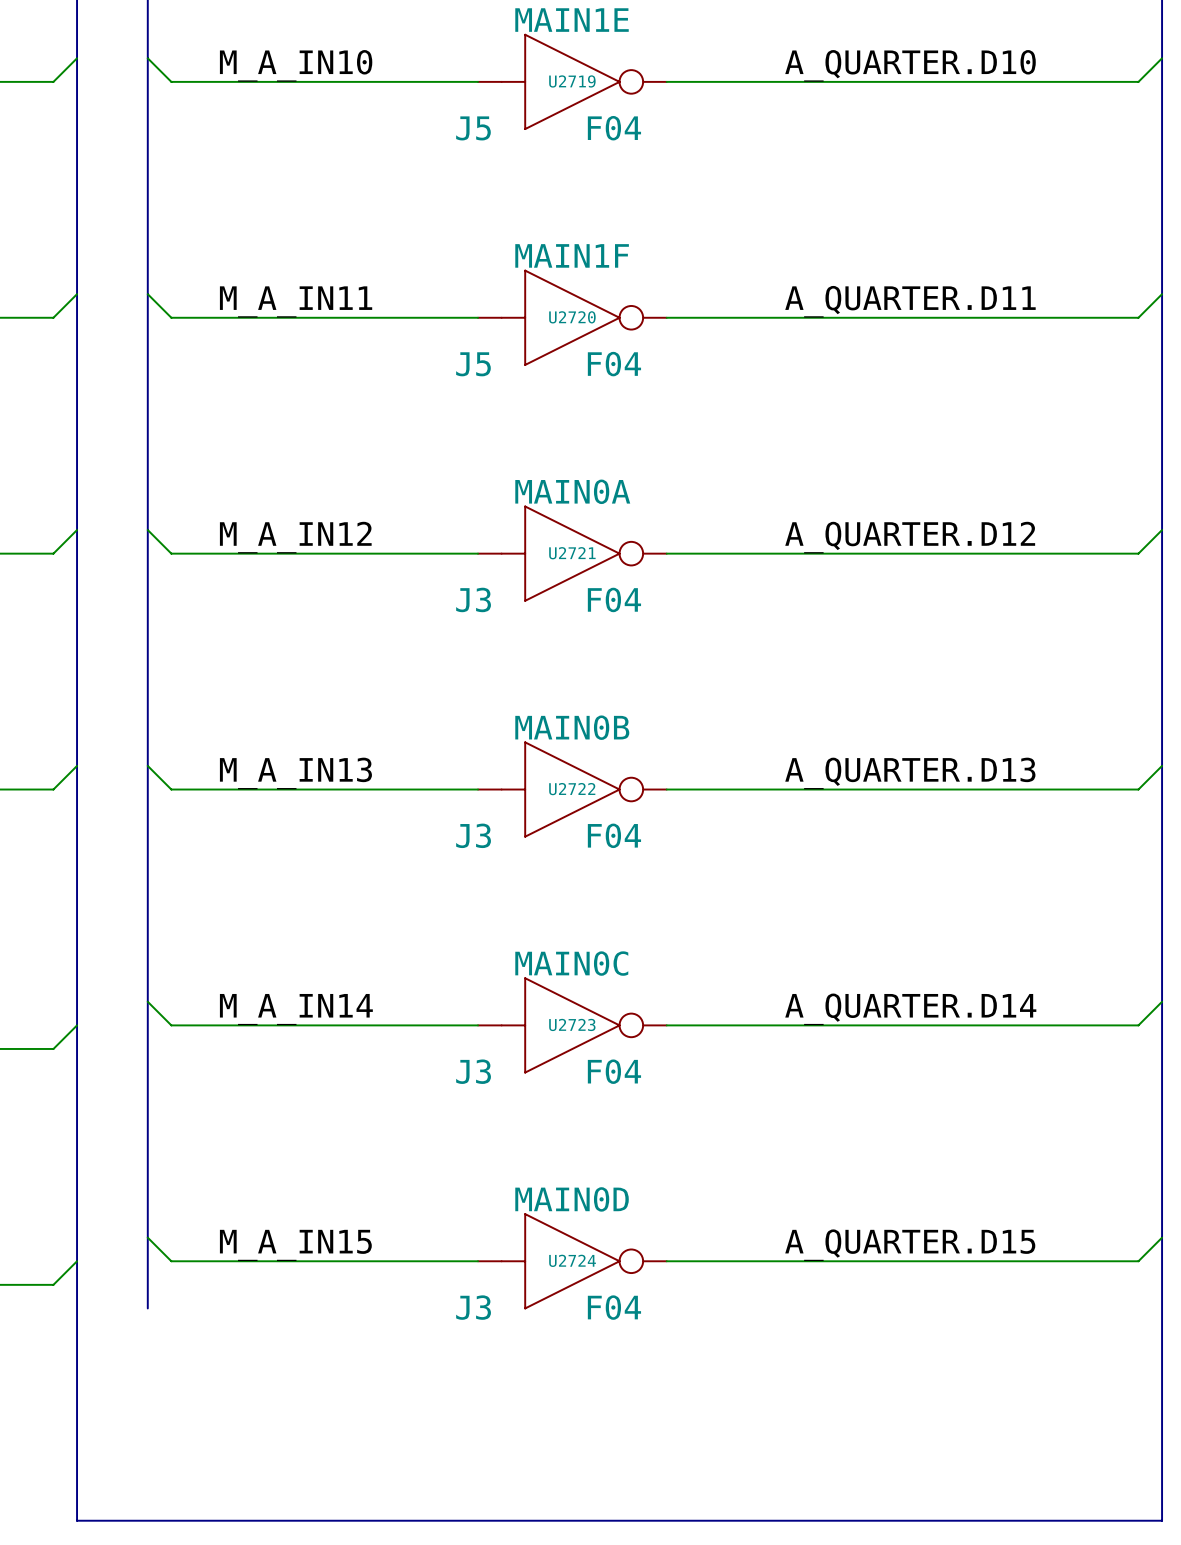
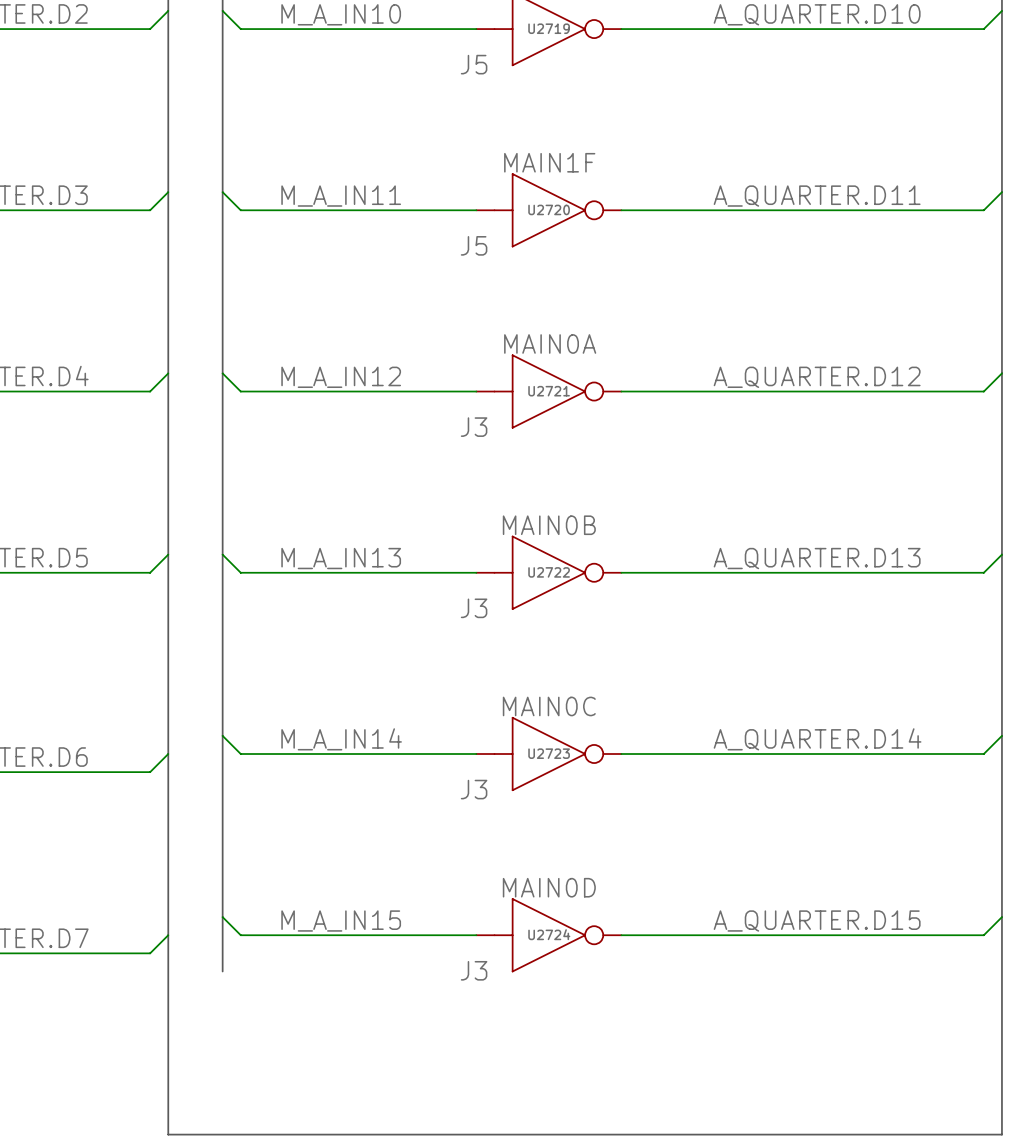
U2719 value: F04 (614, 128) -> none
U2720 value: F04 (614, 364) -> none
U2721 value: F04 (614, 599) -> none
U2722 value: F04 (614, 835) -> none
U2723 value: F04 (614, 1071) -> none
U2724 value: F04 (614, 1307) -> none

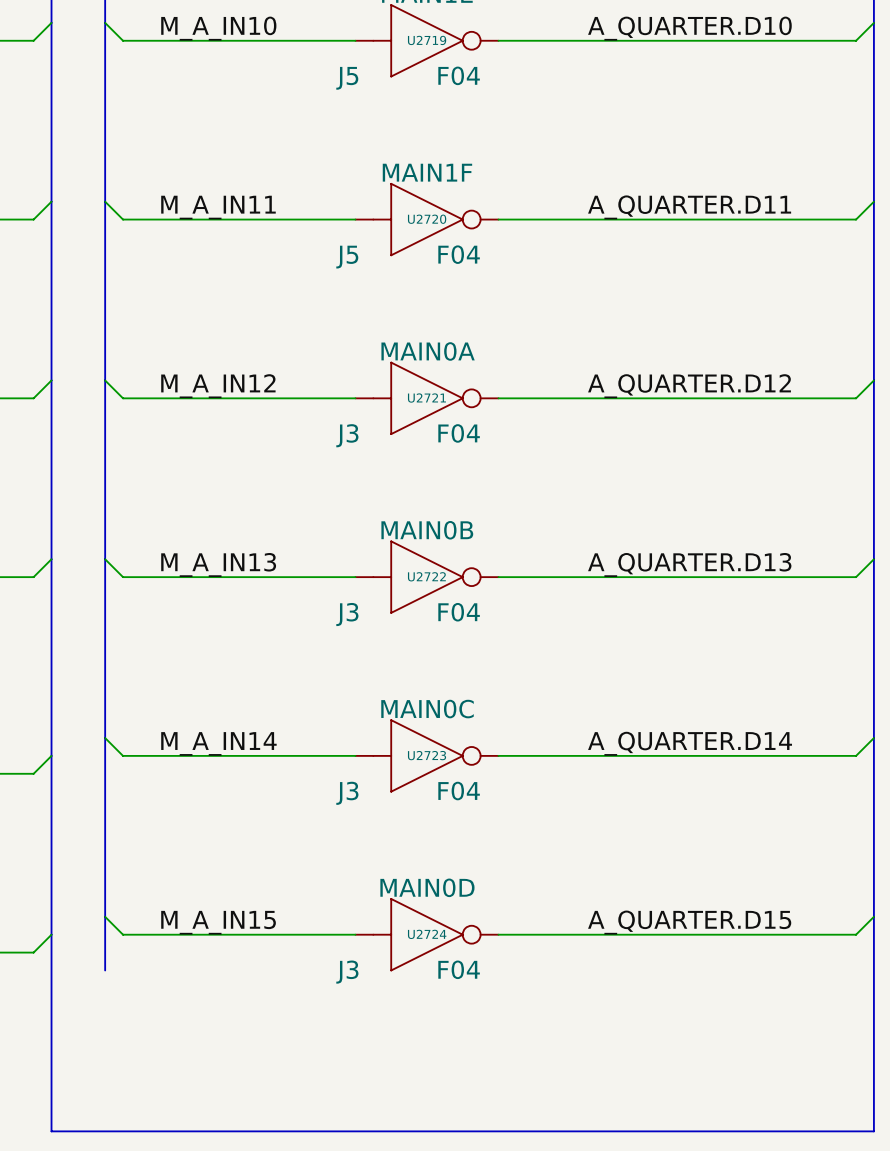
U2719 value: none -> F04 (459, 75)
U2720 value: none -> F04 (459, 254)
U2721 value: none -> F04 (459, 433)
U2722 value: none -> F04 (459, 612)
U2723 value: none -> F04 (459, 791)
U2724 value: none -> F04 (459, 969)

